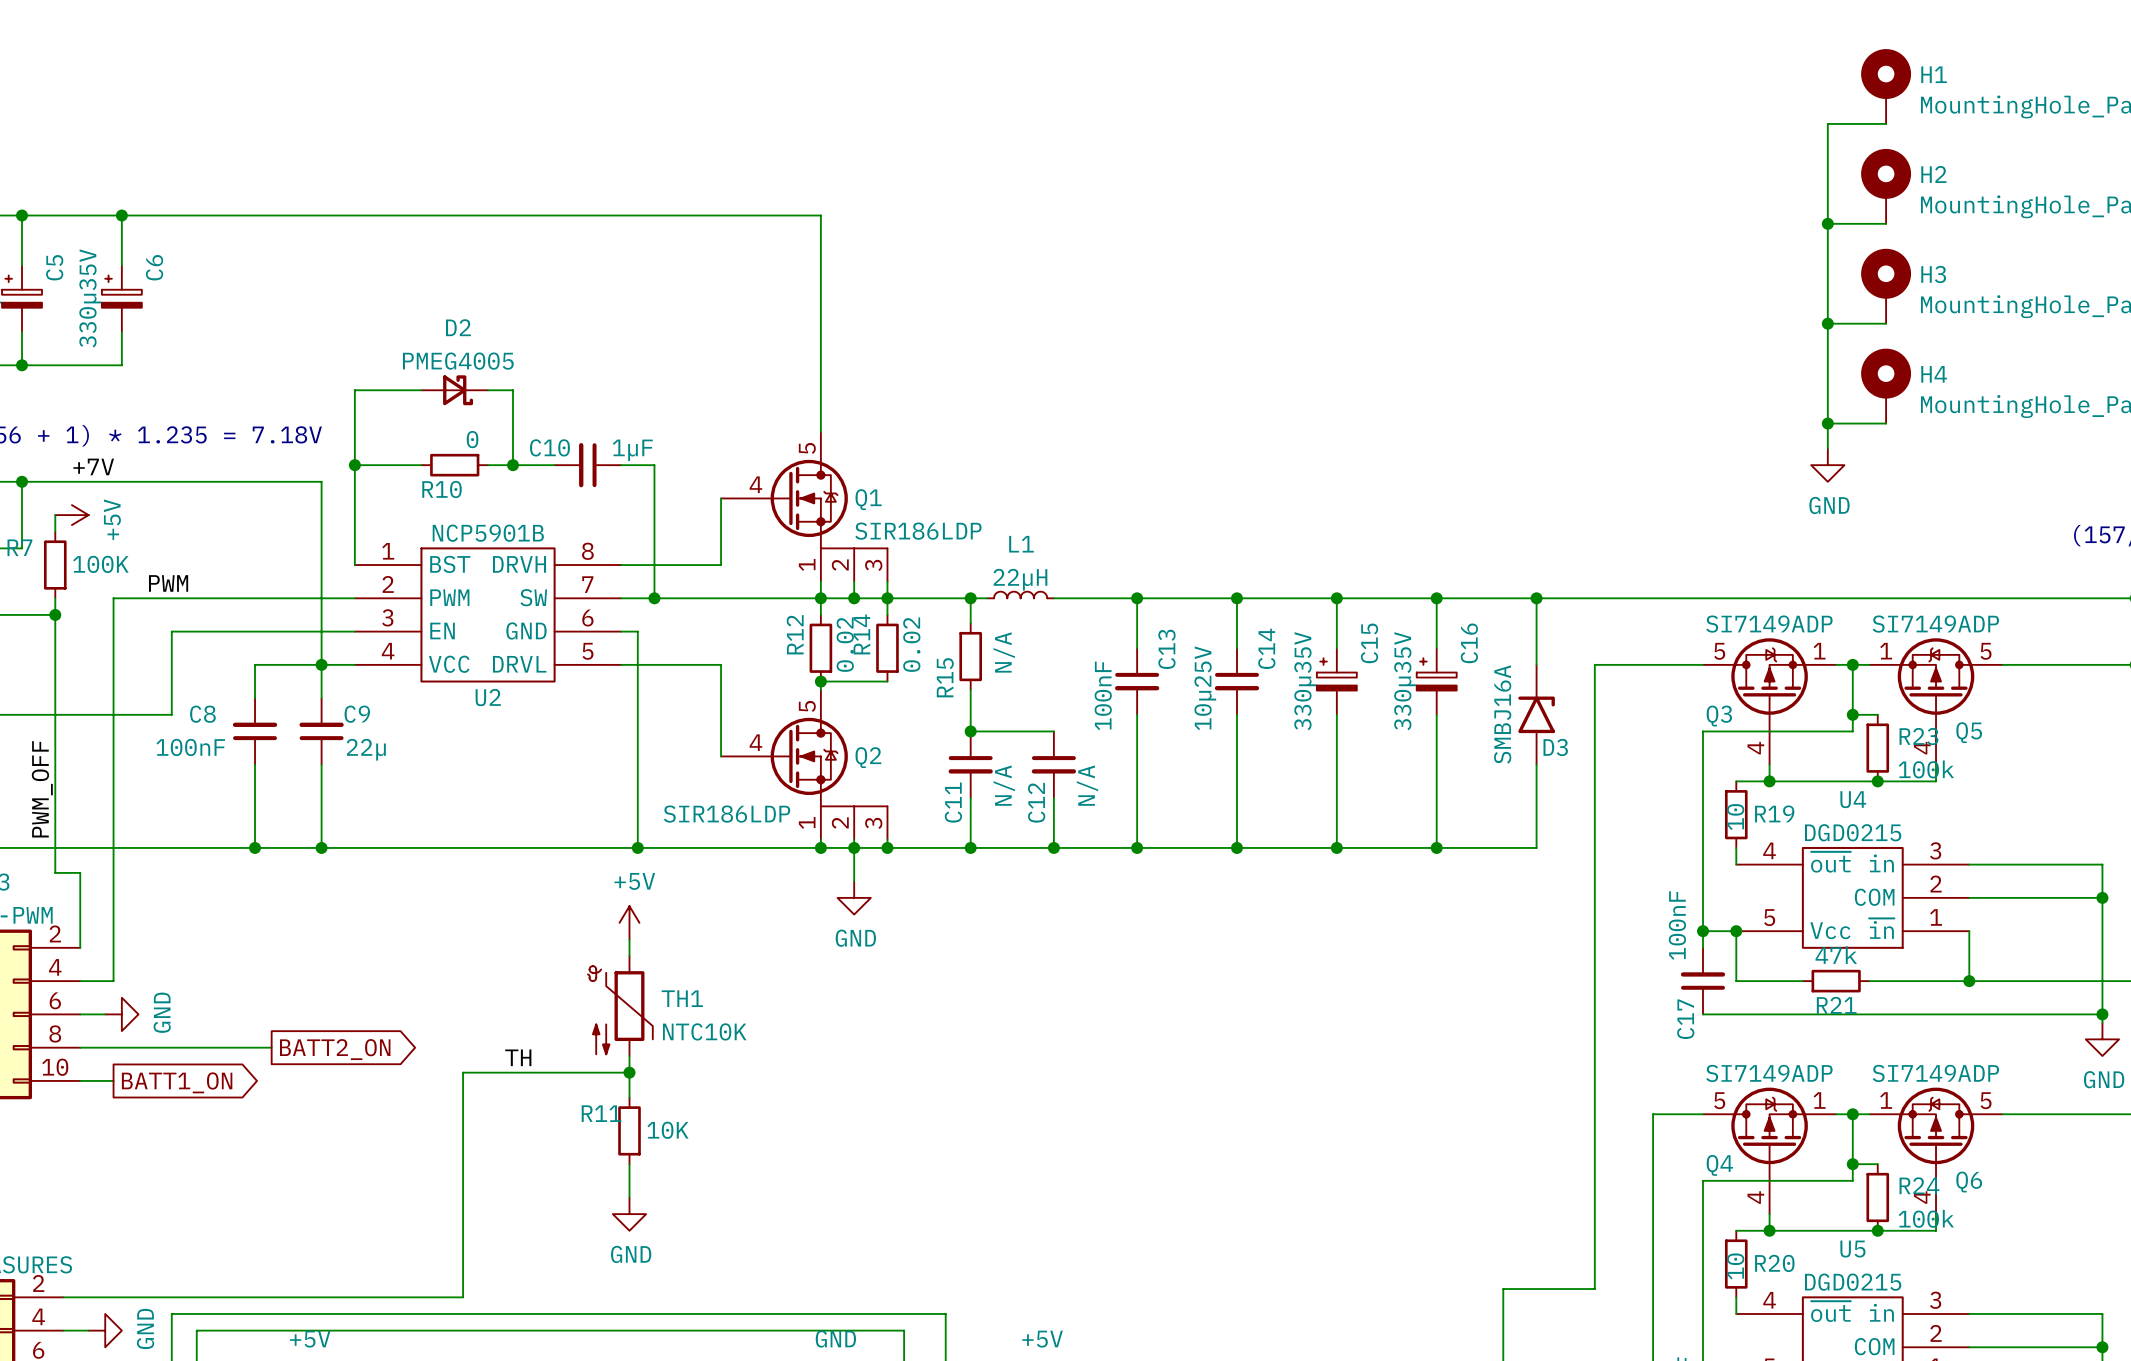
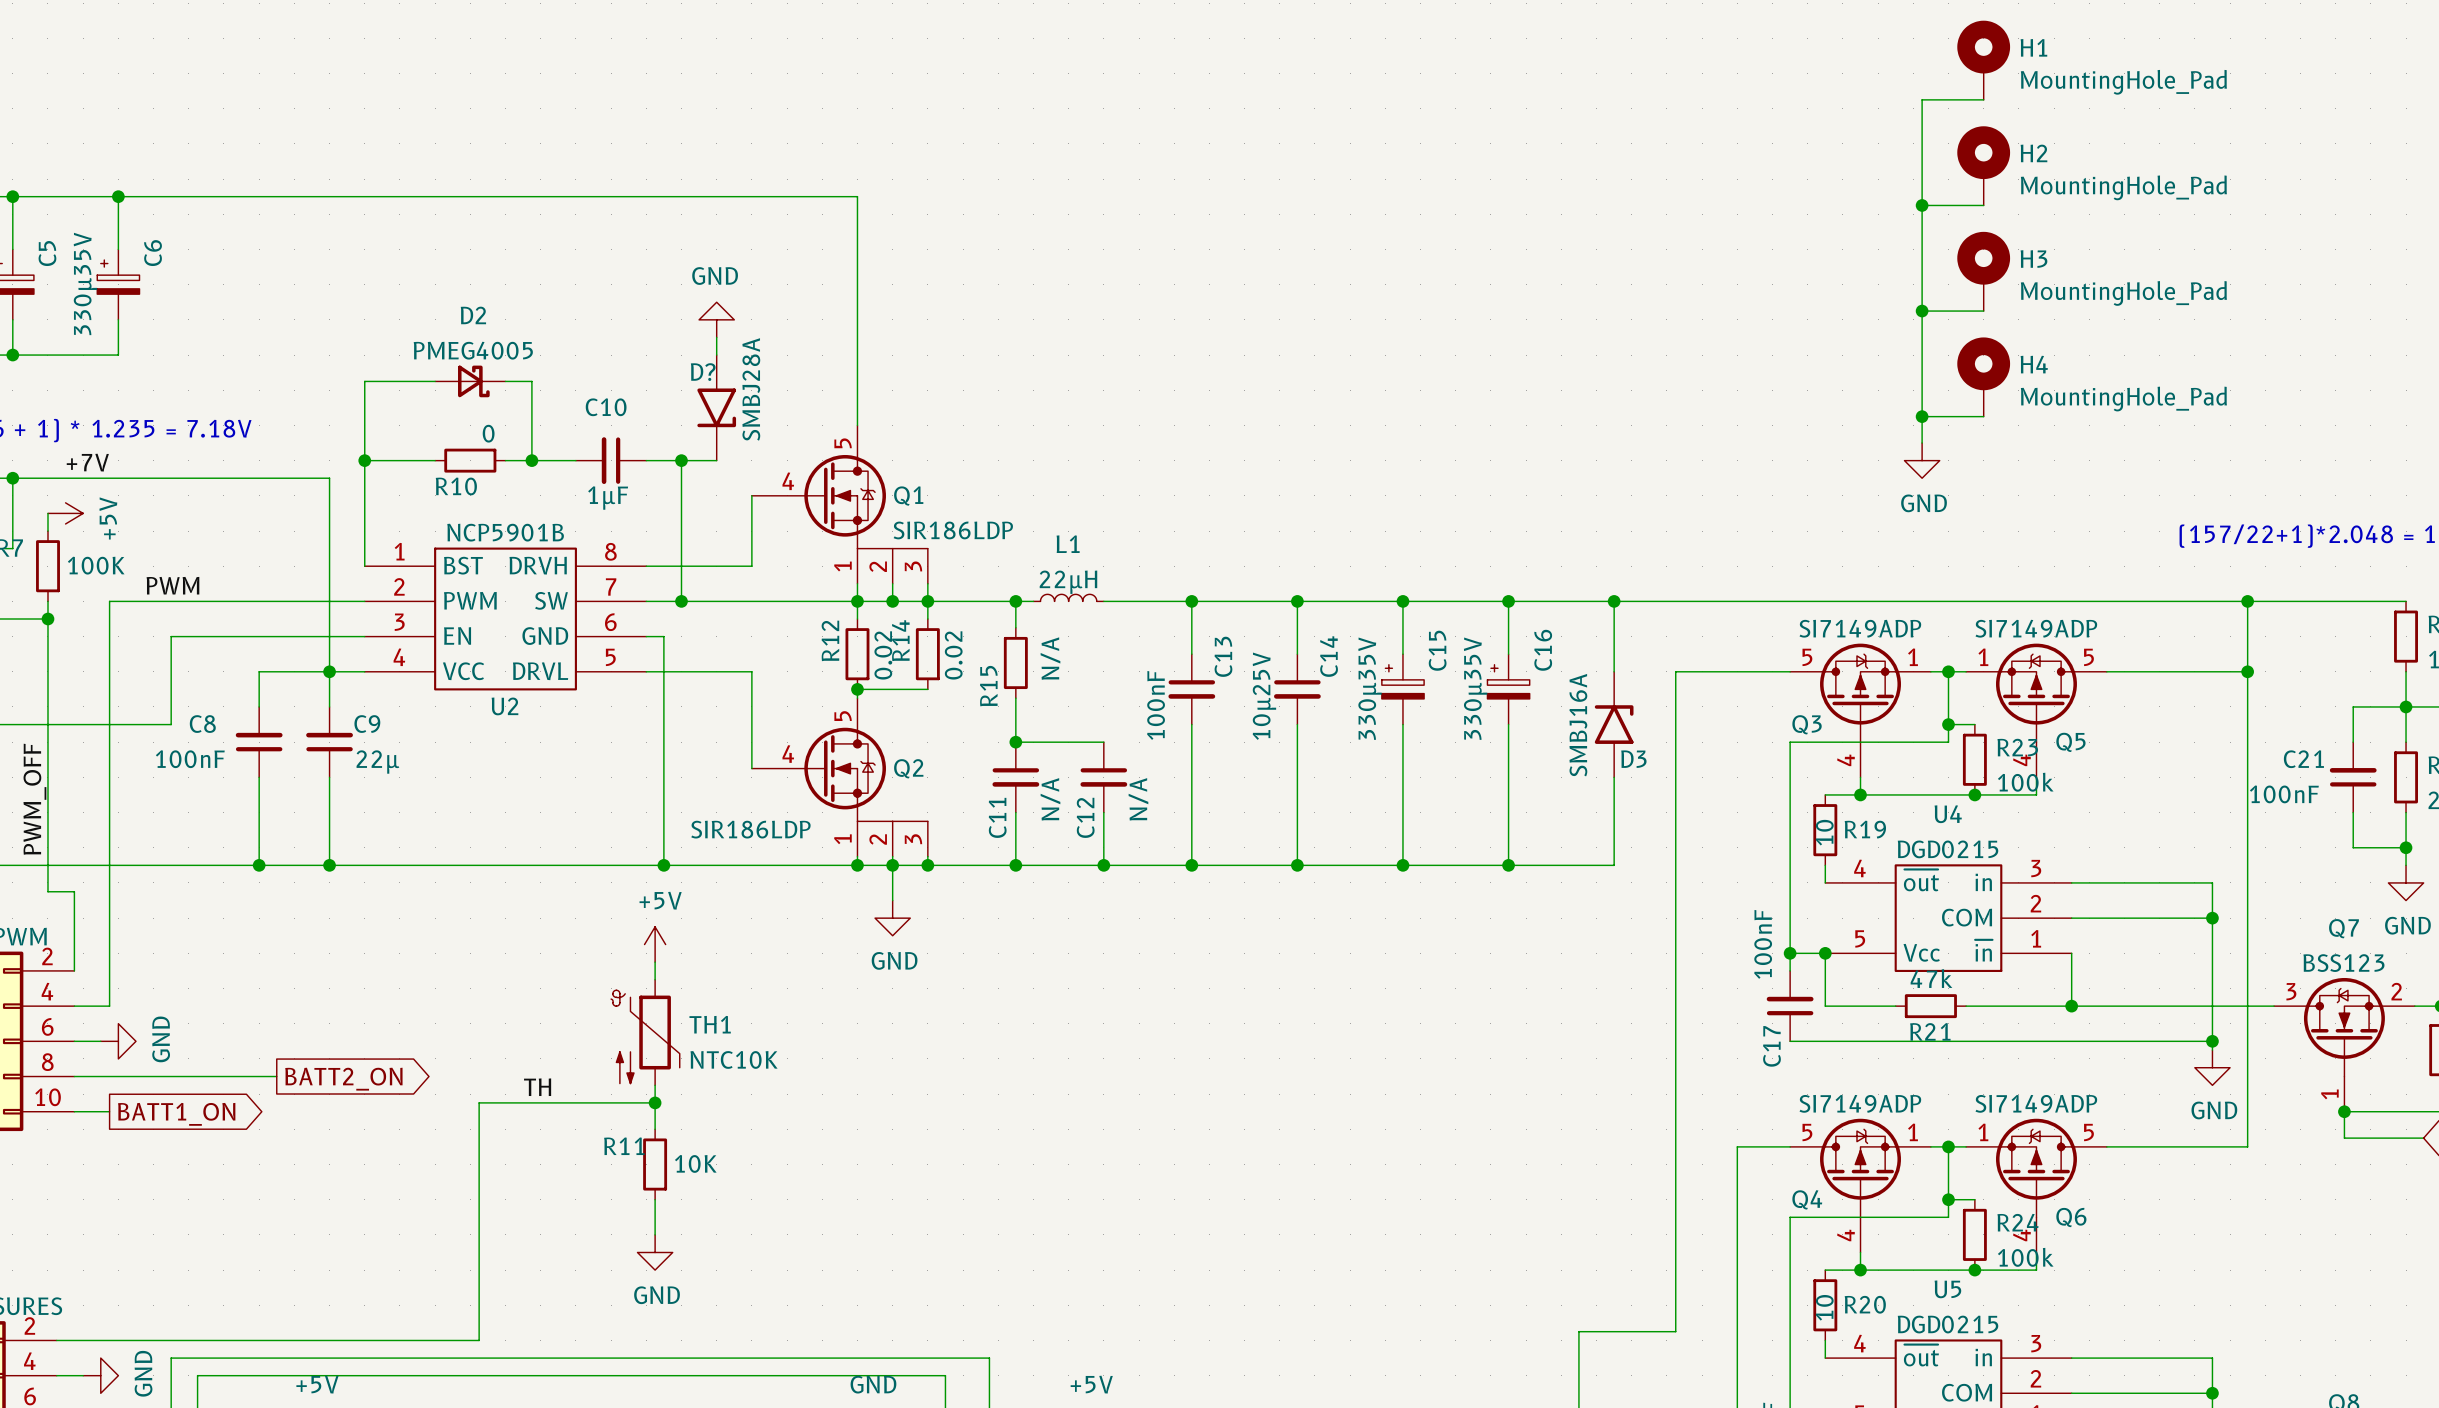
power symbol: none -> GND (716, 319)
wire: none -> (716, 337) (716, 355)
D?: none -> SMBJ28A (716, 407)
C10 name position: C10 (549, 447) -> C10 (606, 407)
C10 value position: 1µF (632, 450) -> 1µF (608, 498)
wire: none -> (681, 460) (716, 460)
junction: none -> (681, 460)

